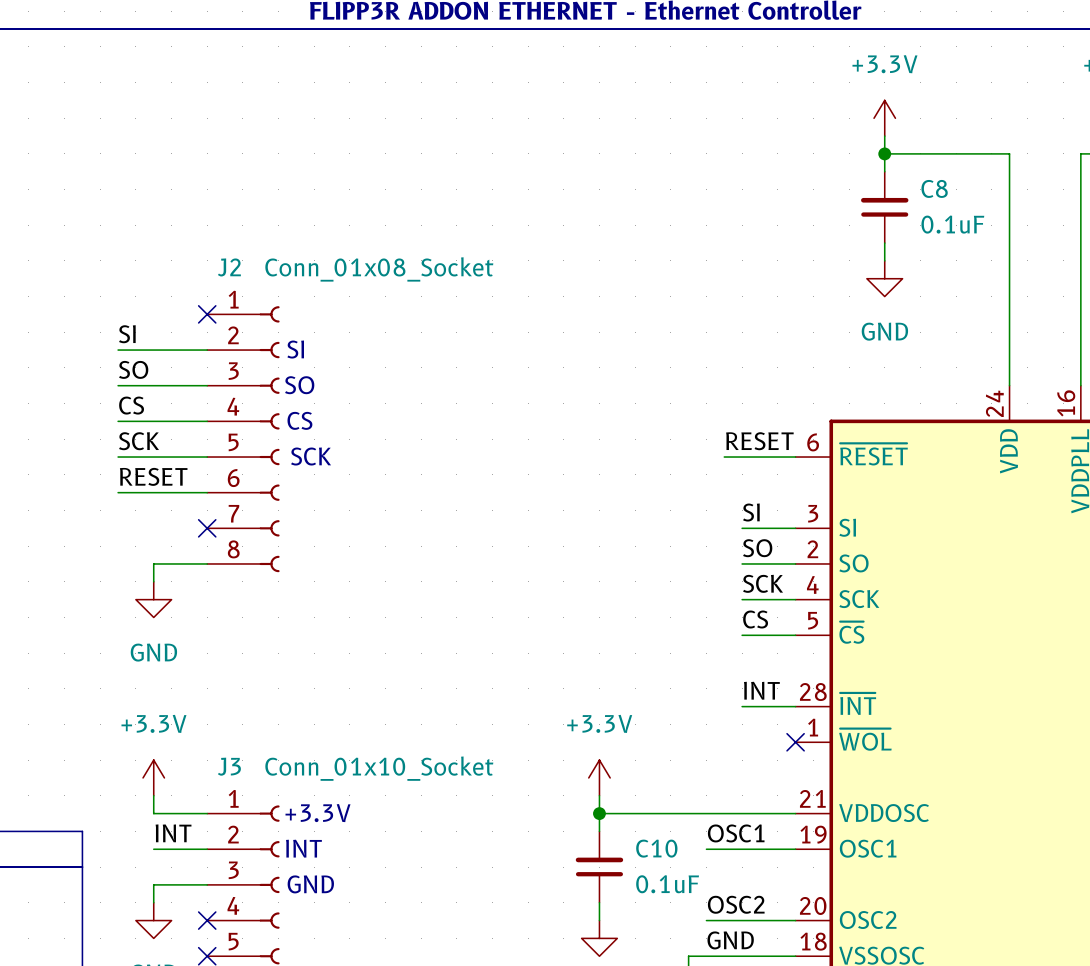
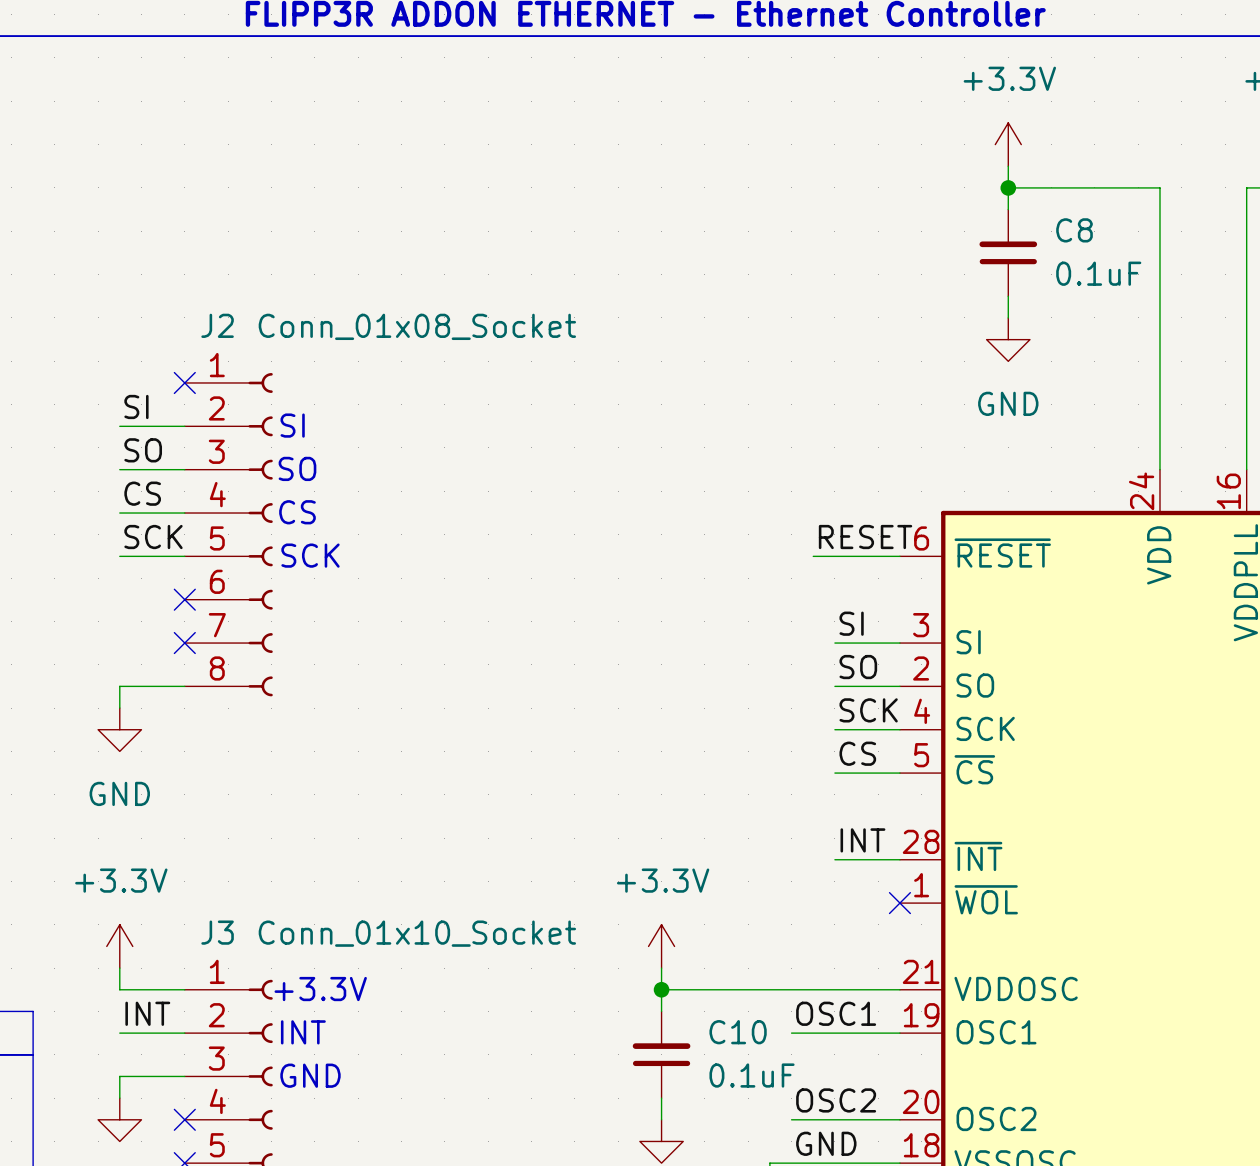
label position: SI (127, 334) -> SI (136, 406)
wire: (118, 350) (153, 350) -> none
label position: SO (133, 369) -> SO (143, 450)
wire: (118, 385) (153, 385) -> none
label position: CS (131, 405) -> CS (142, 493)
wire: (118, 421) (153, 421) -> none
label position: SCK (139, 441) -> SCK (153, 537)
wire: (118, 457) (153, 457) -> none
label: RESET (153, 476) -> none
wire: (118, 492) (207, 492) -> none
no-connect mark: none -> (184, 599)

